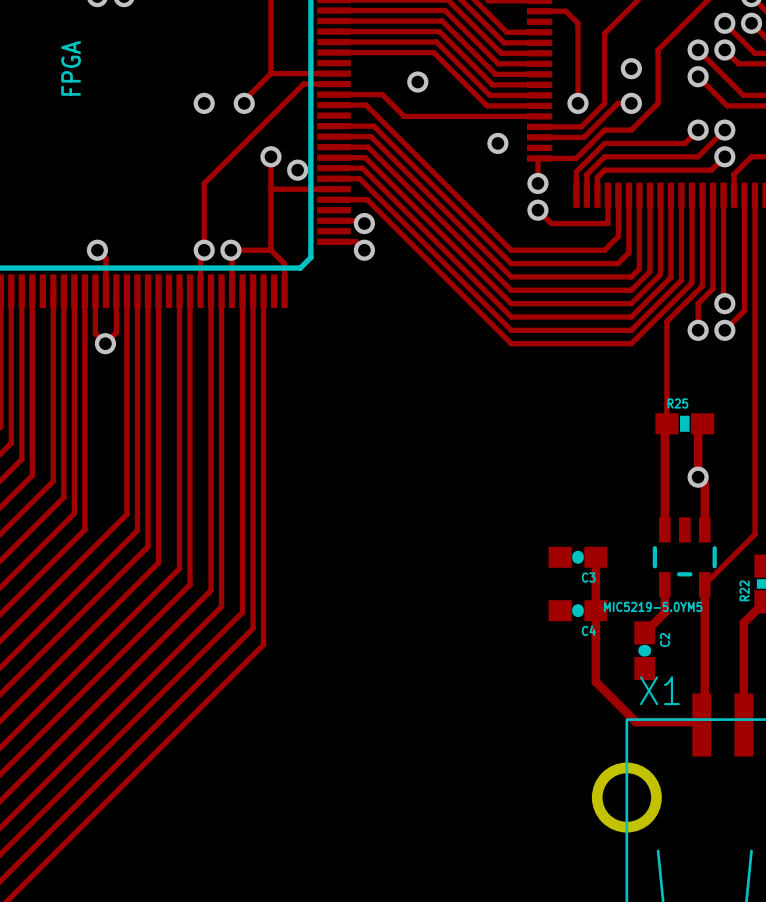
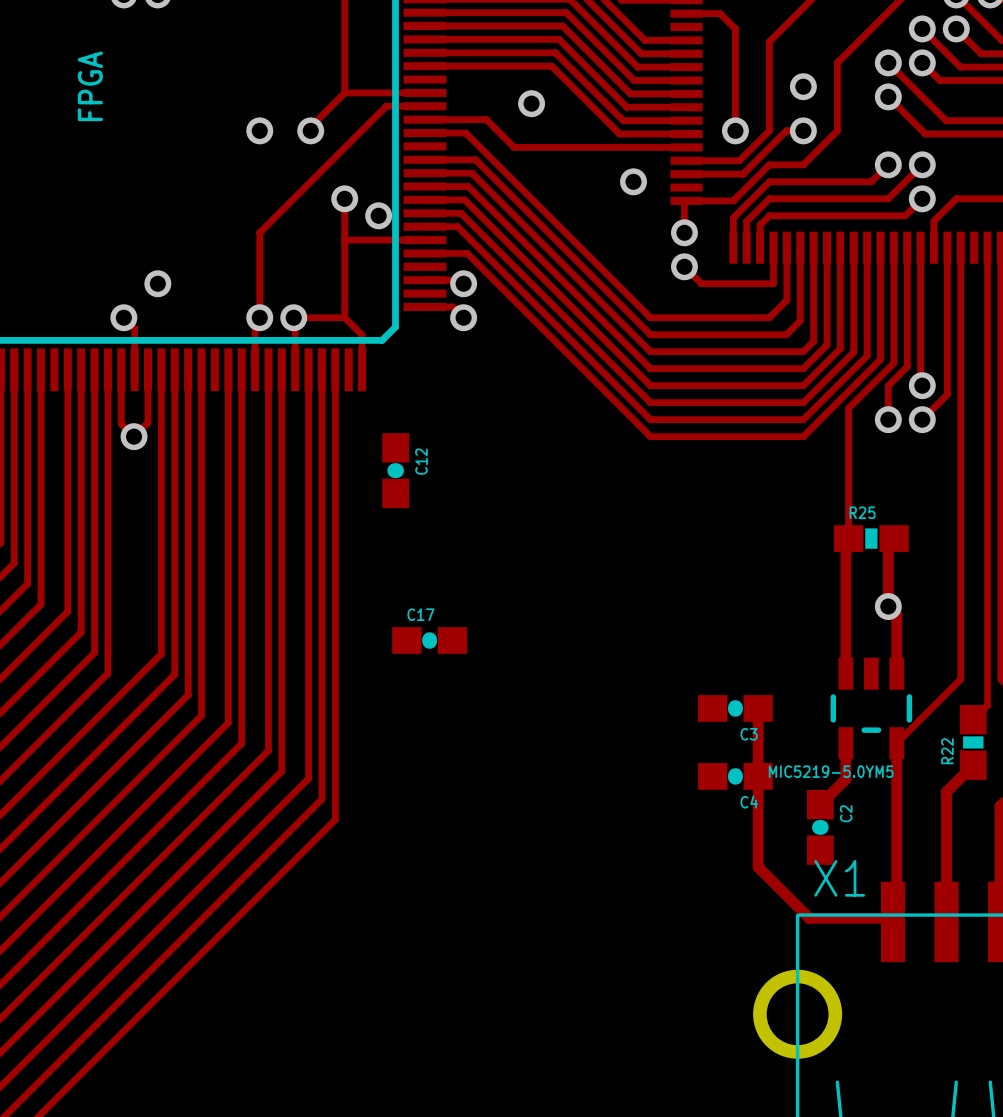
via: none -> (157, 283)
C12: none -> (395, 470)
C17: none -> (429, 640)

